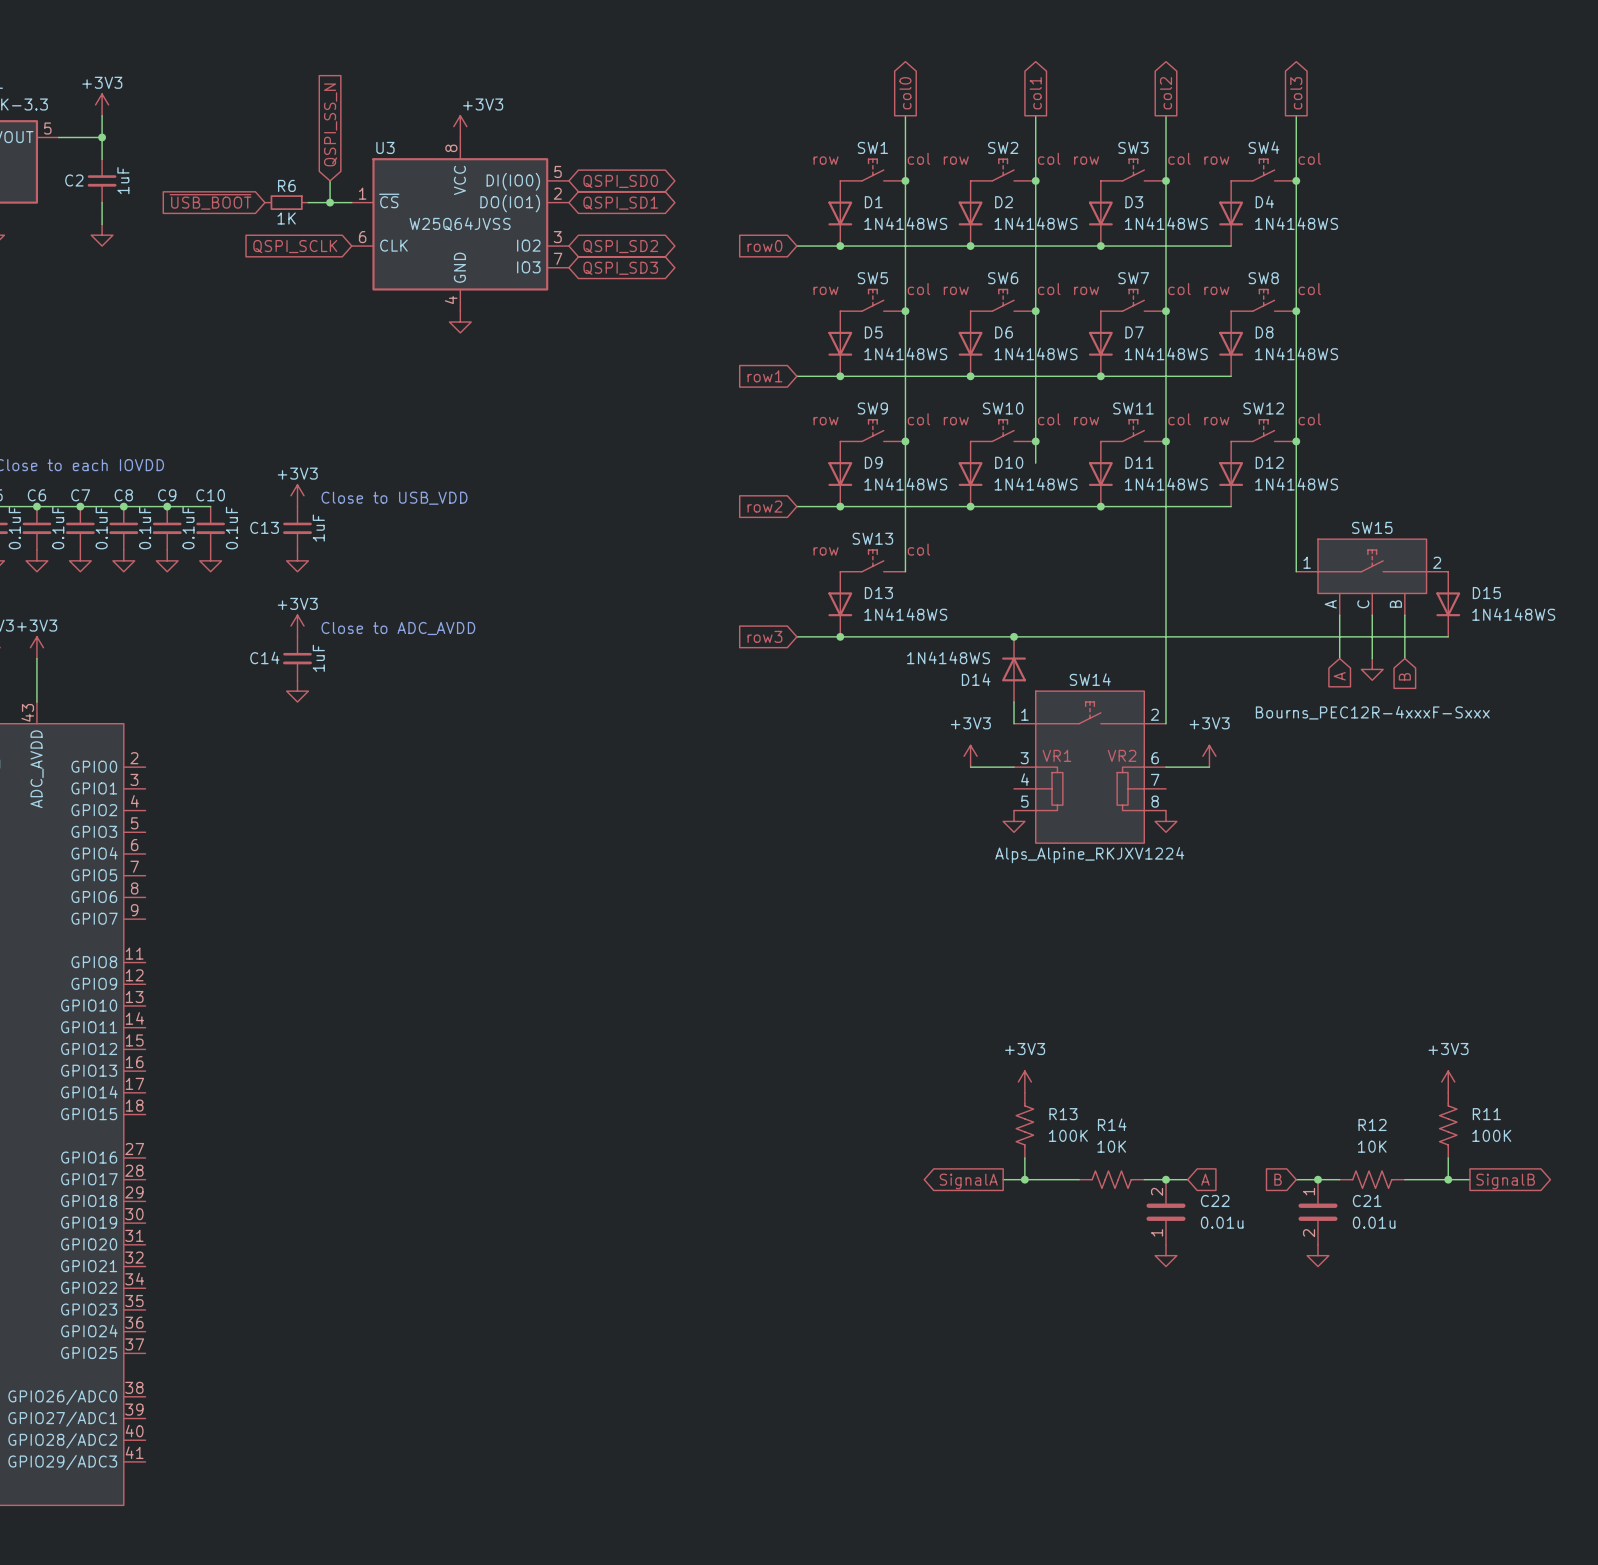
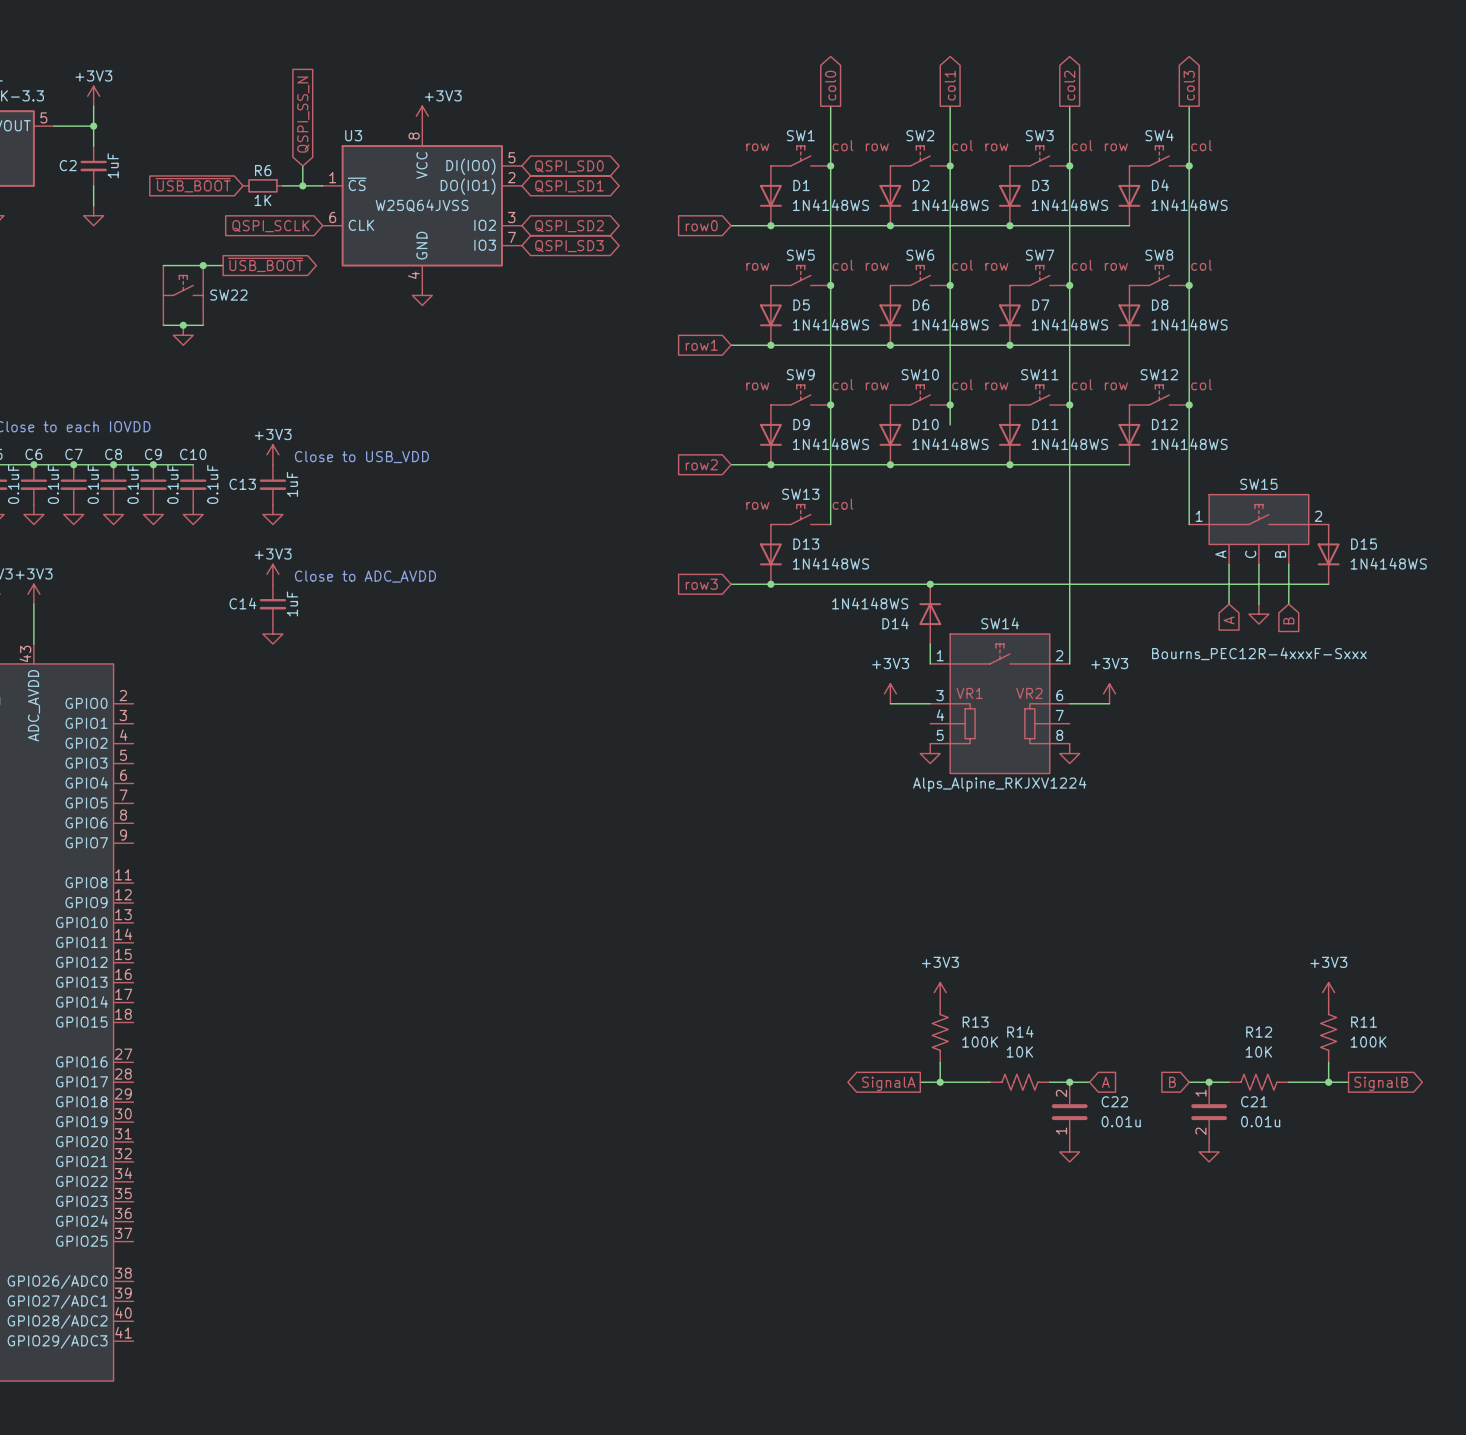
global label: none -> ~{USB_BOOT} (265, 264)
wire: none -> (163, 265) (223, 265)
junction: none -> (203, 265)
SW22: none -> (183, 295)
wire: none -> (163, 325) (203, 325)
junction: none -> (183, 325)
power symbol: none -> (183, 335)

